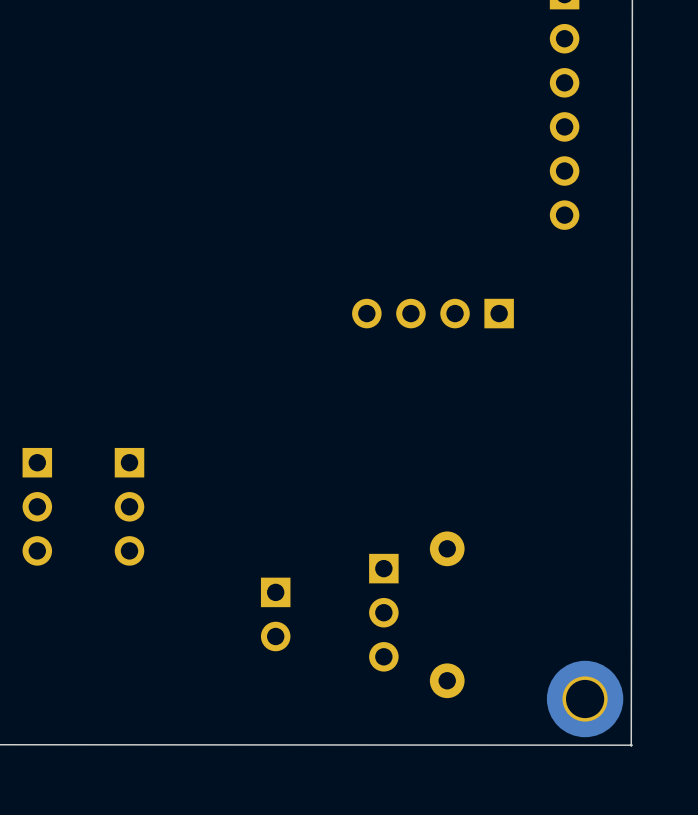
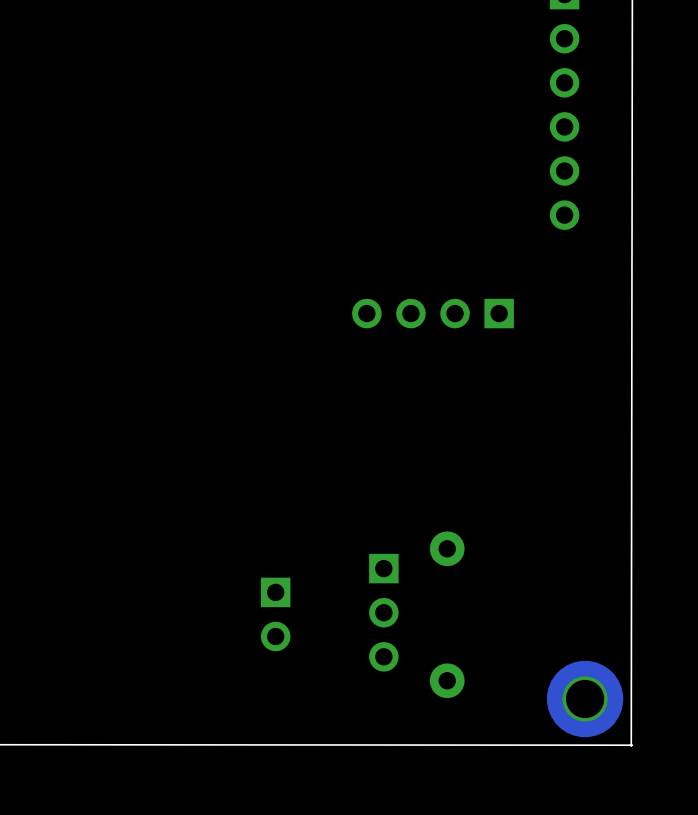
part: (37, 506) -> none
part: (129, 506) -> none

